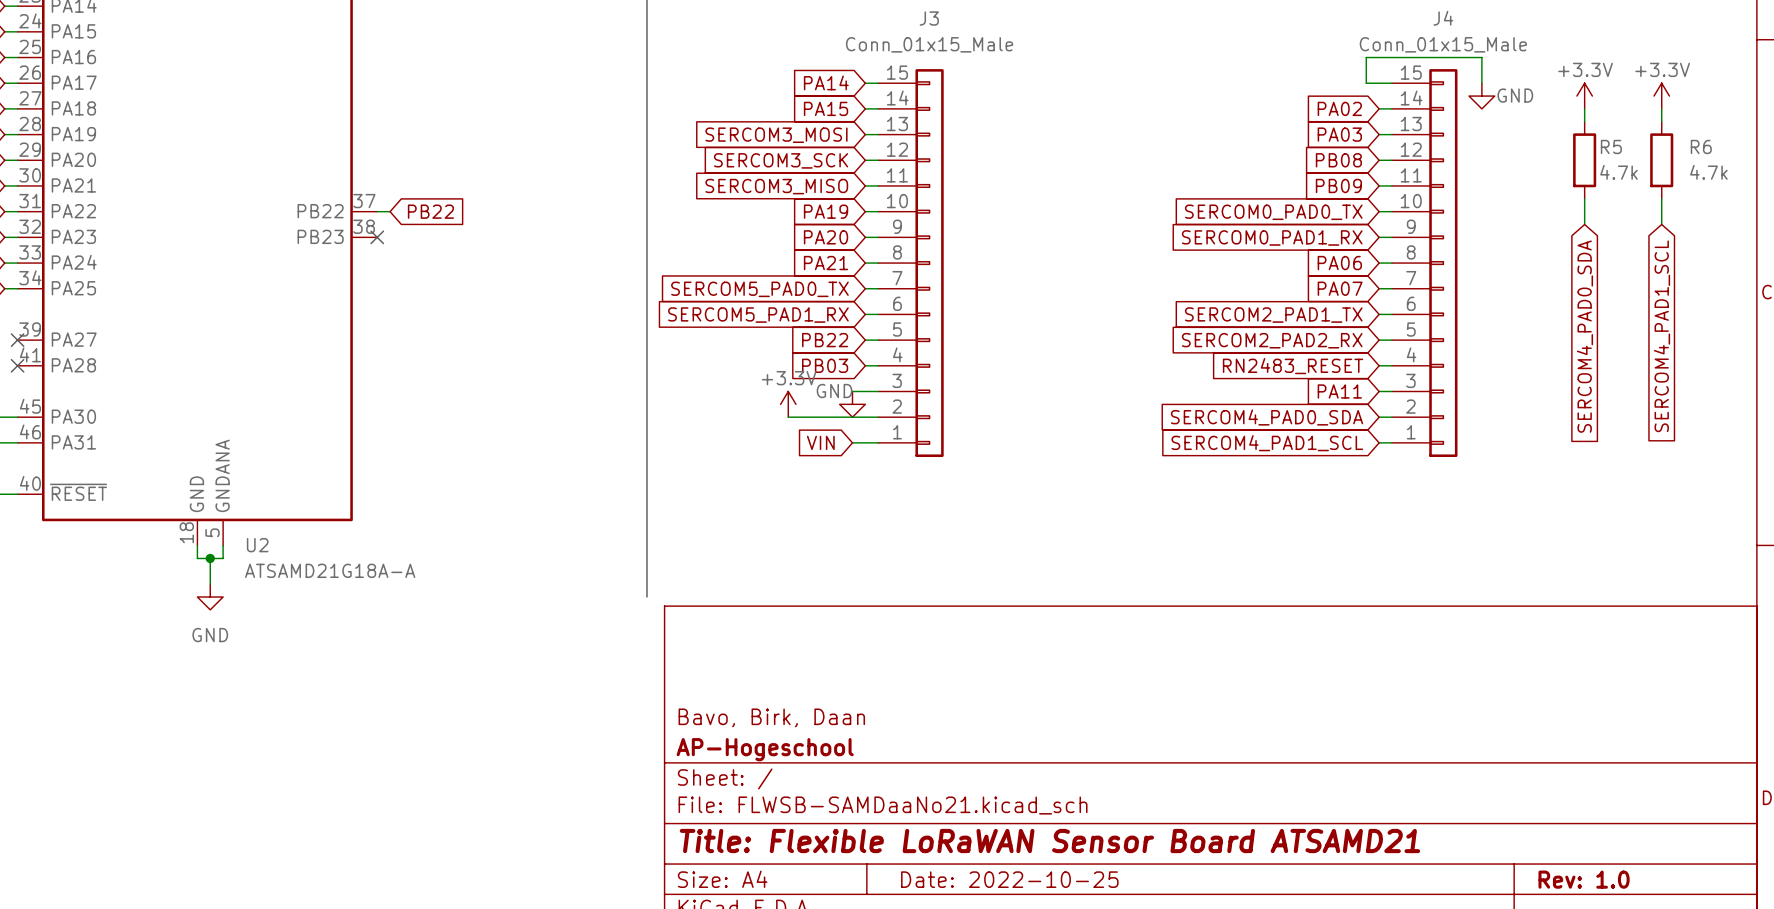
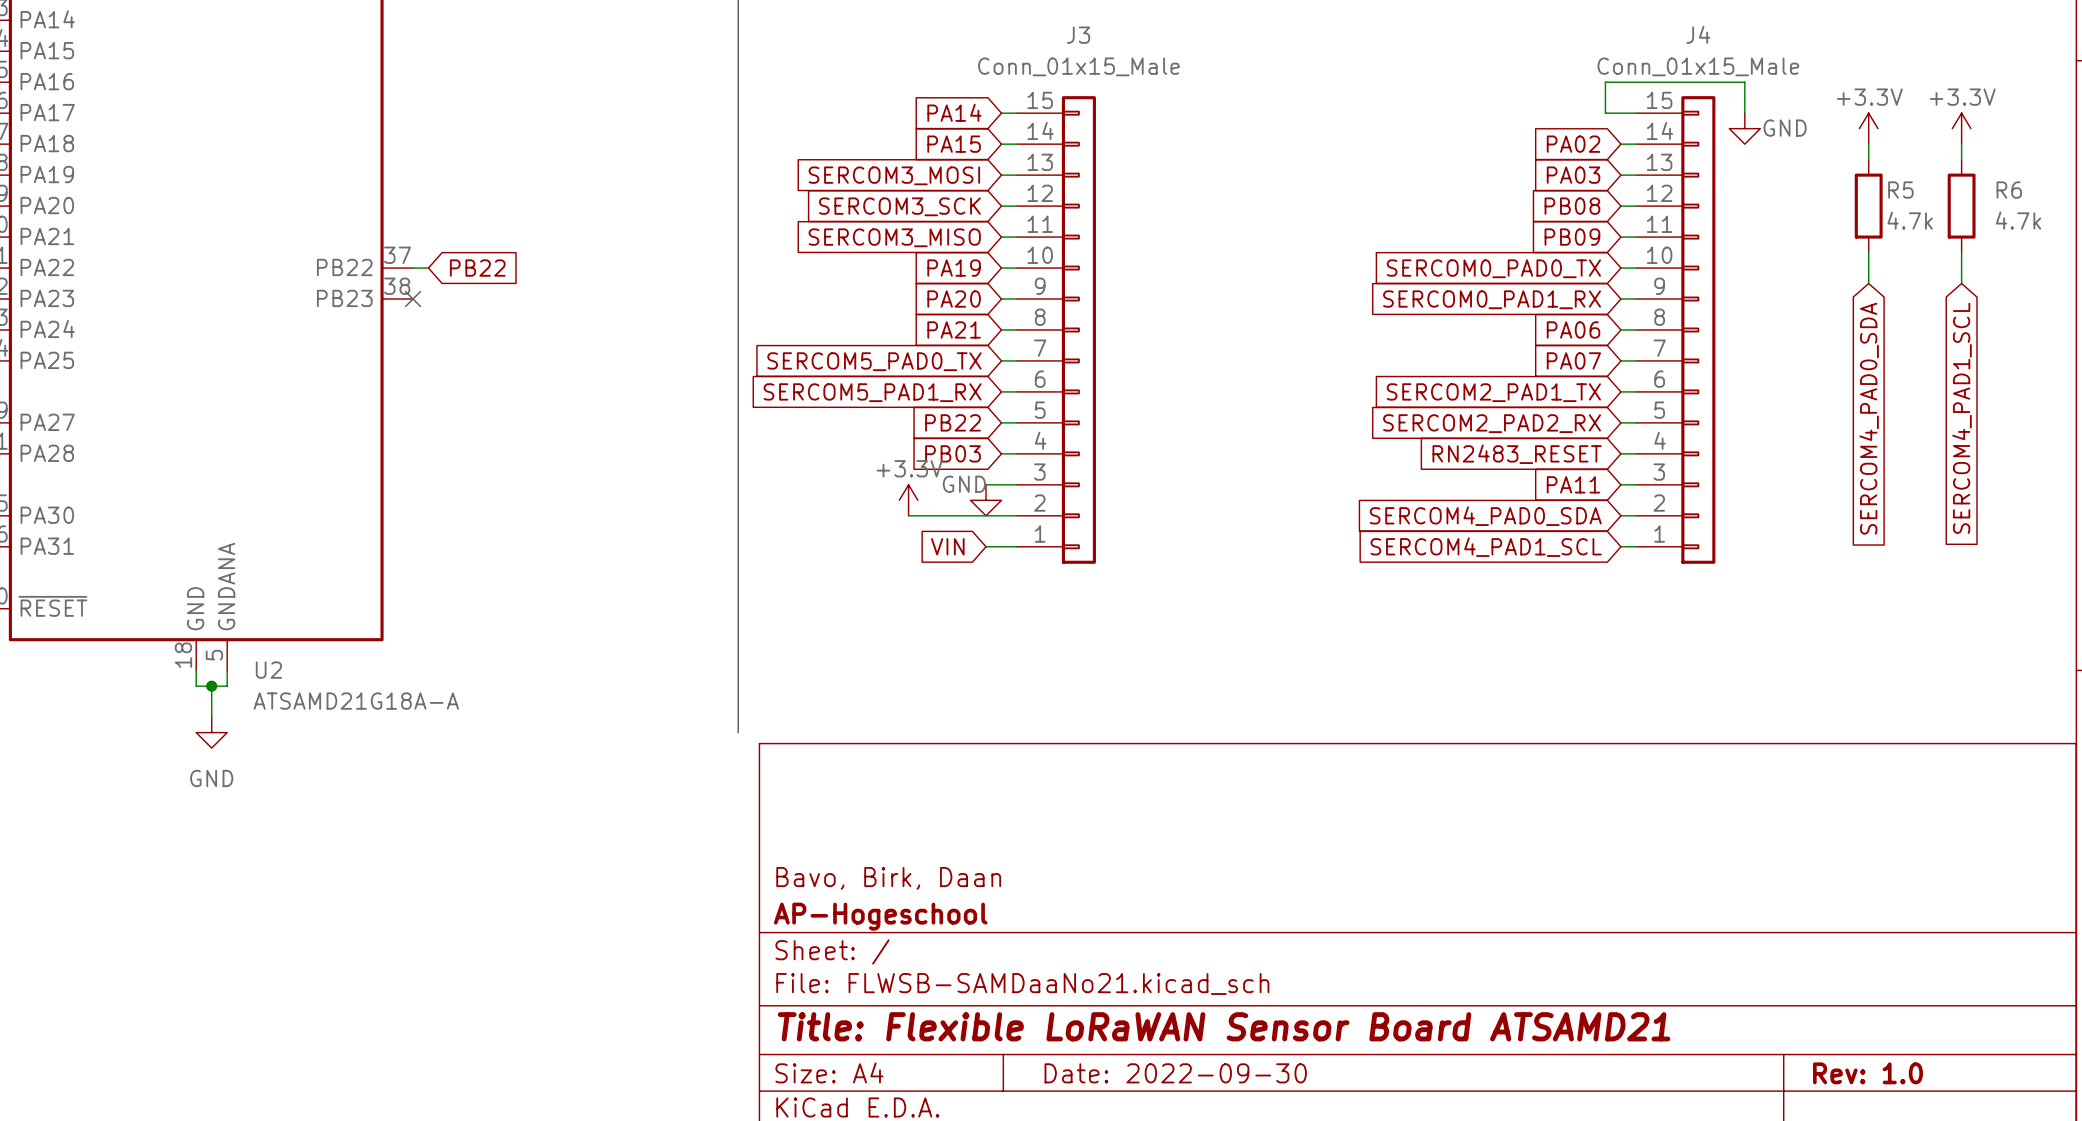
title block: Date: 2022-10-25 (1009, 879) -> Date: 2022-09-30 (1175, 1073)

